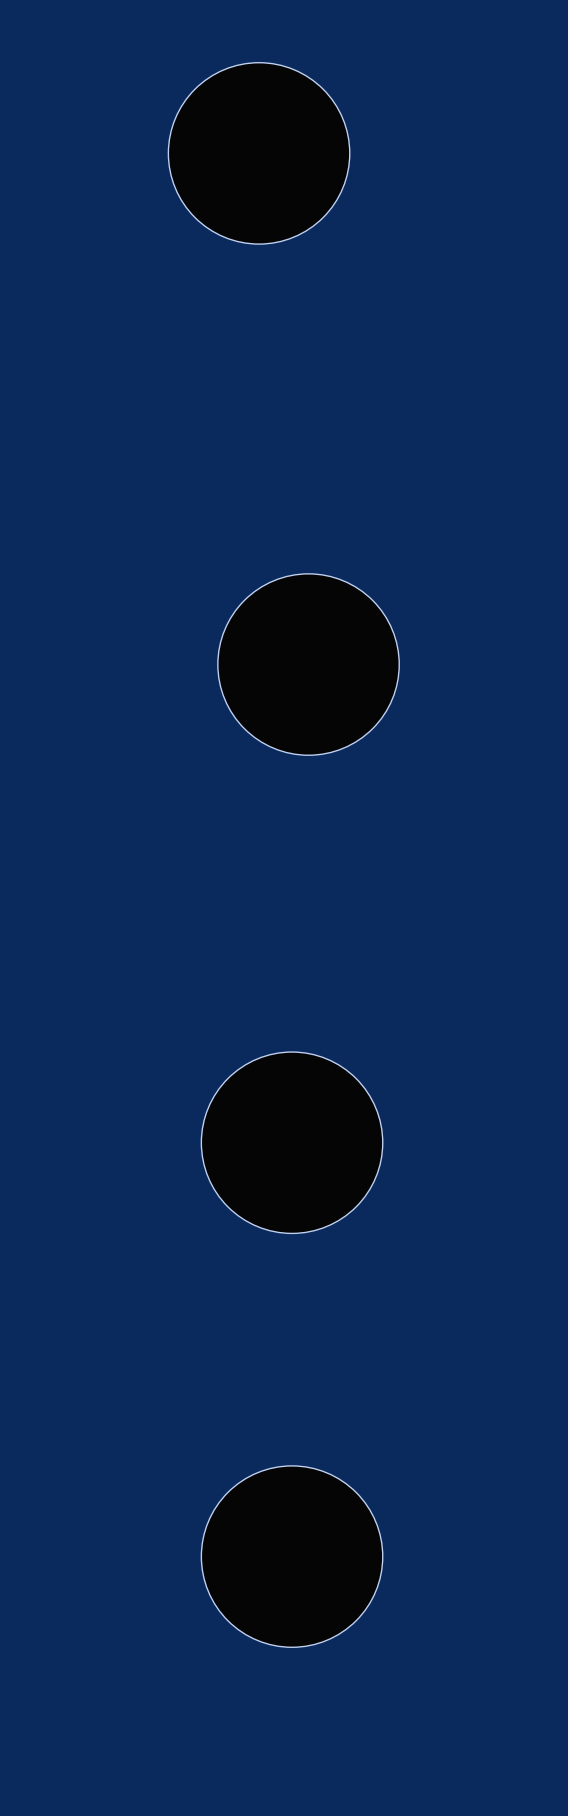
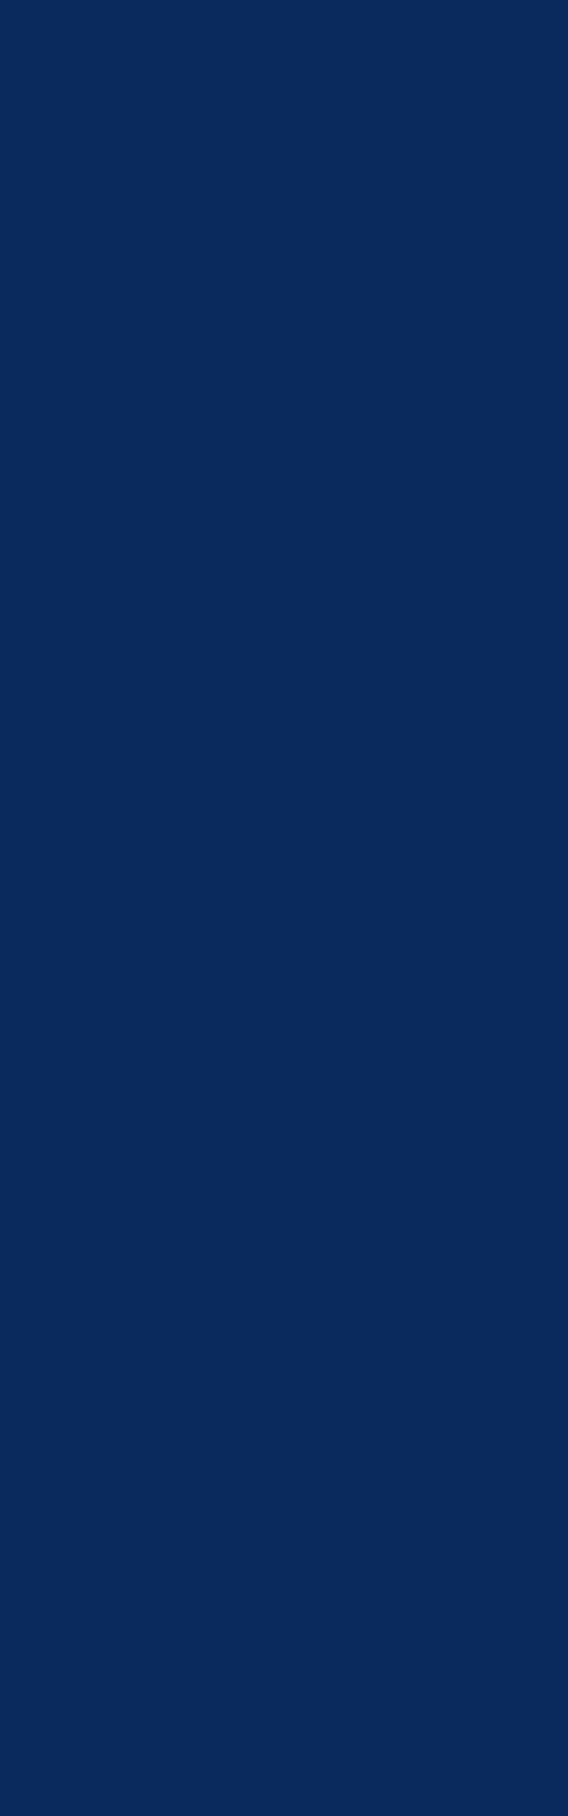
part: (259, 153) -> none
part: (308, 664) -> none
part: (292, 1142) -> none
part: (292, 1556) -> none

